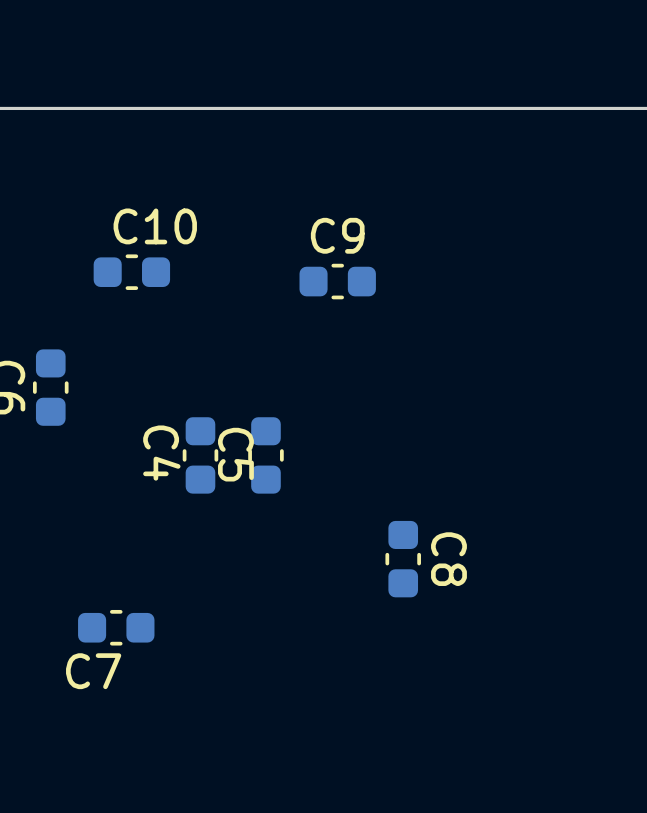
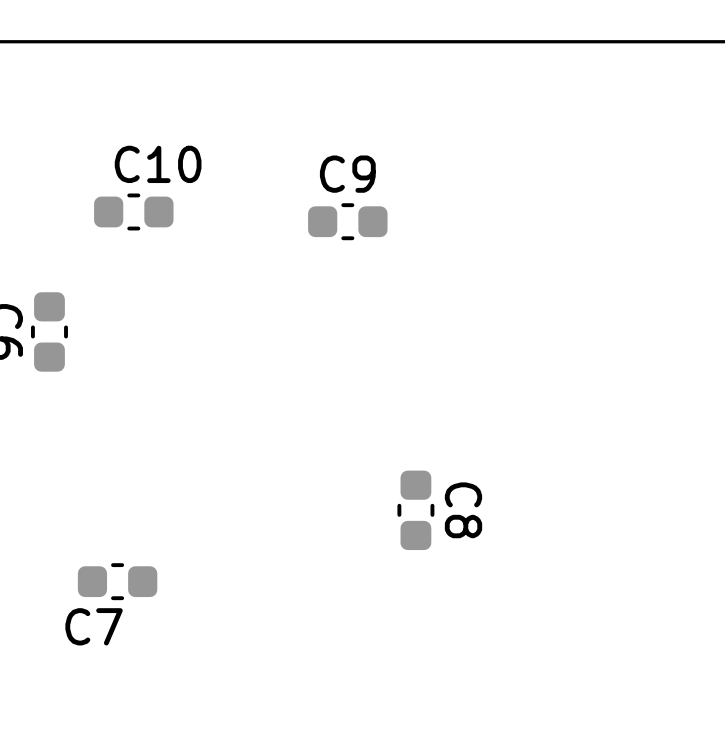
C4: (200, 455) -> none
C5: (265, 455) -> none

